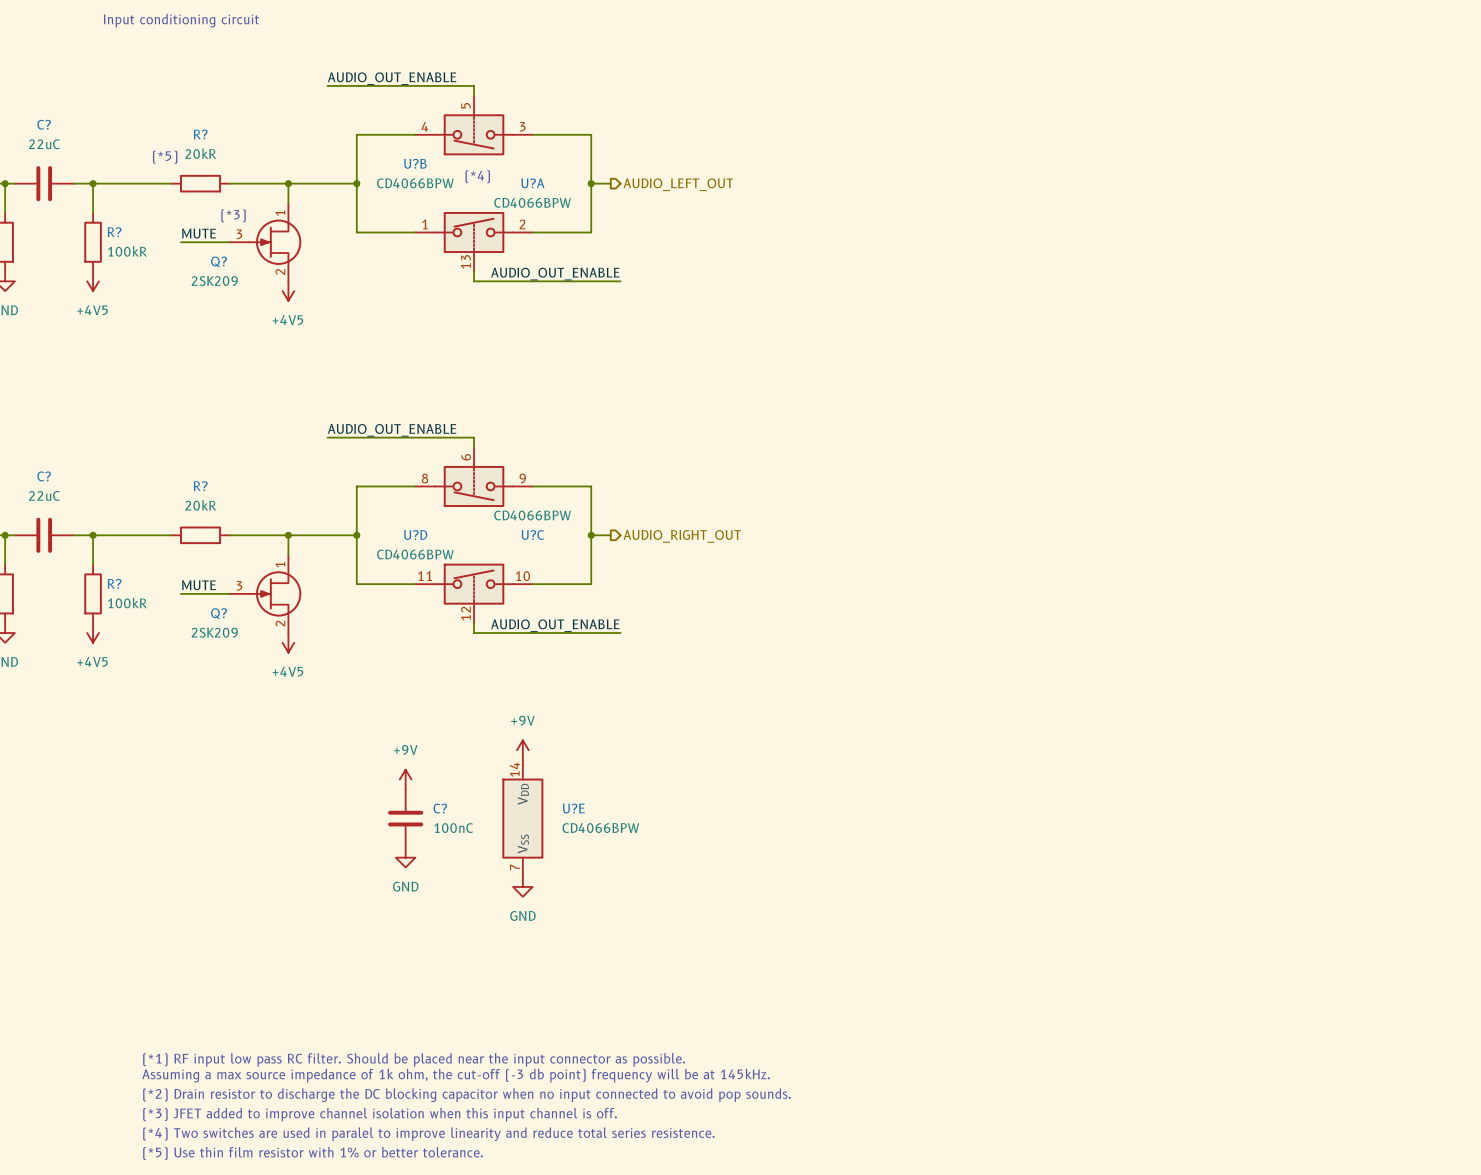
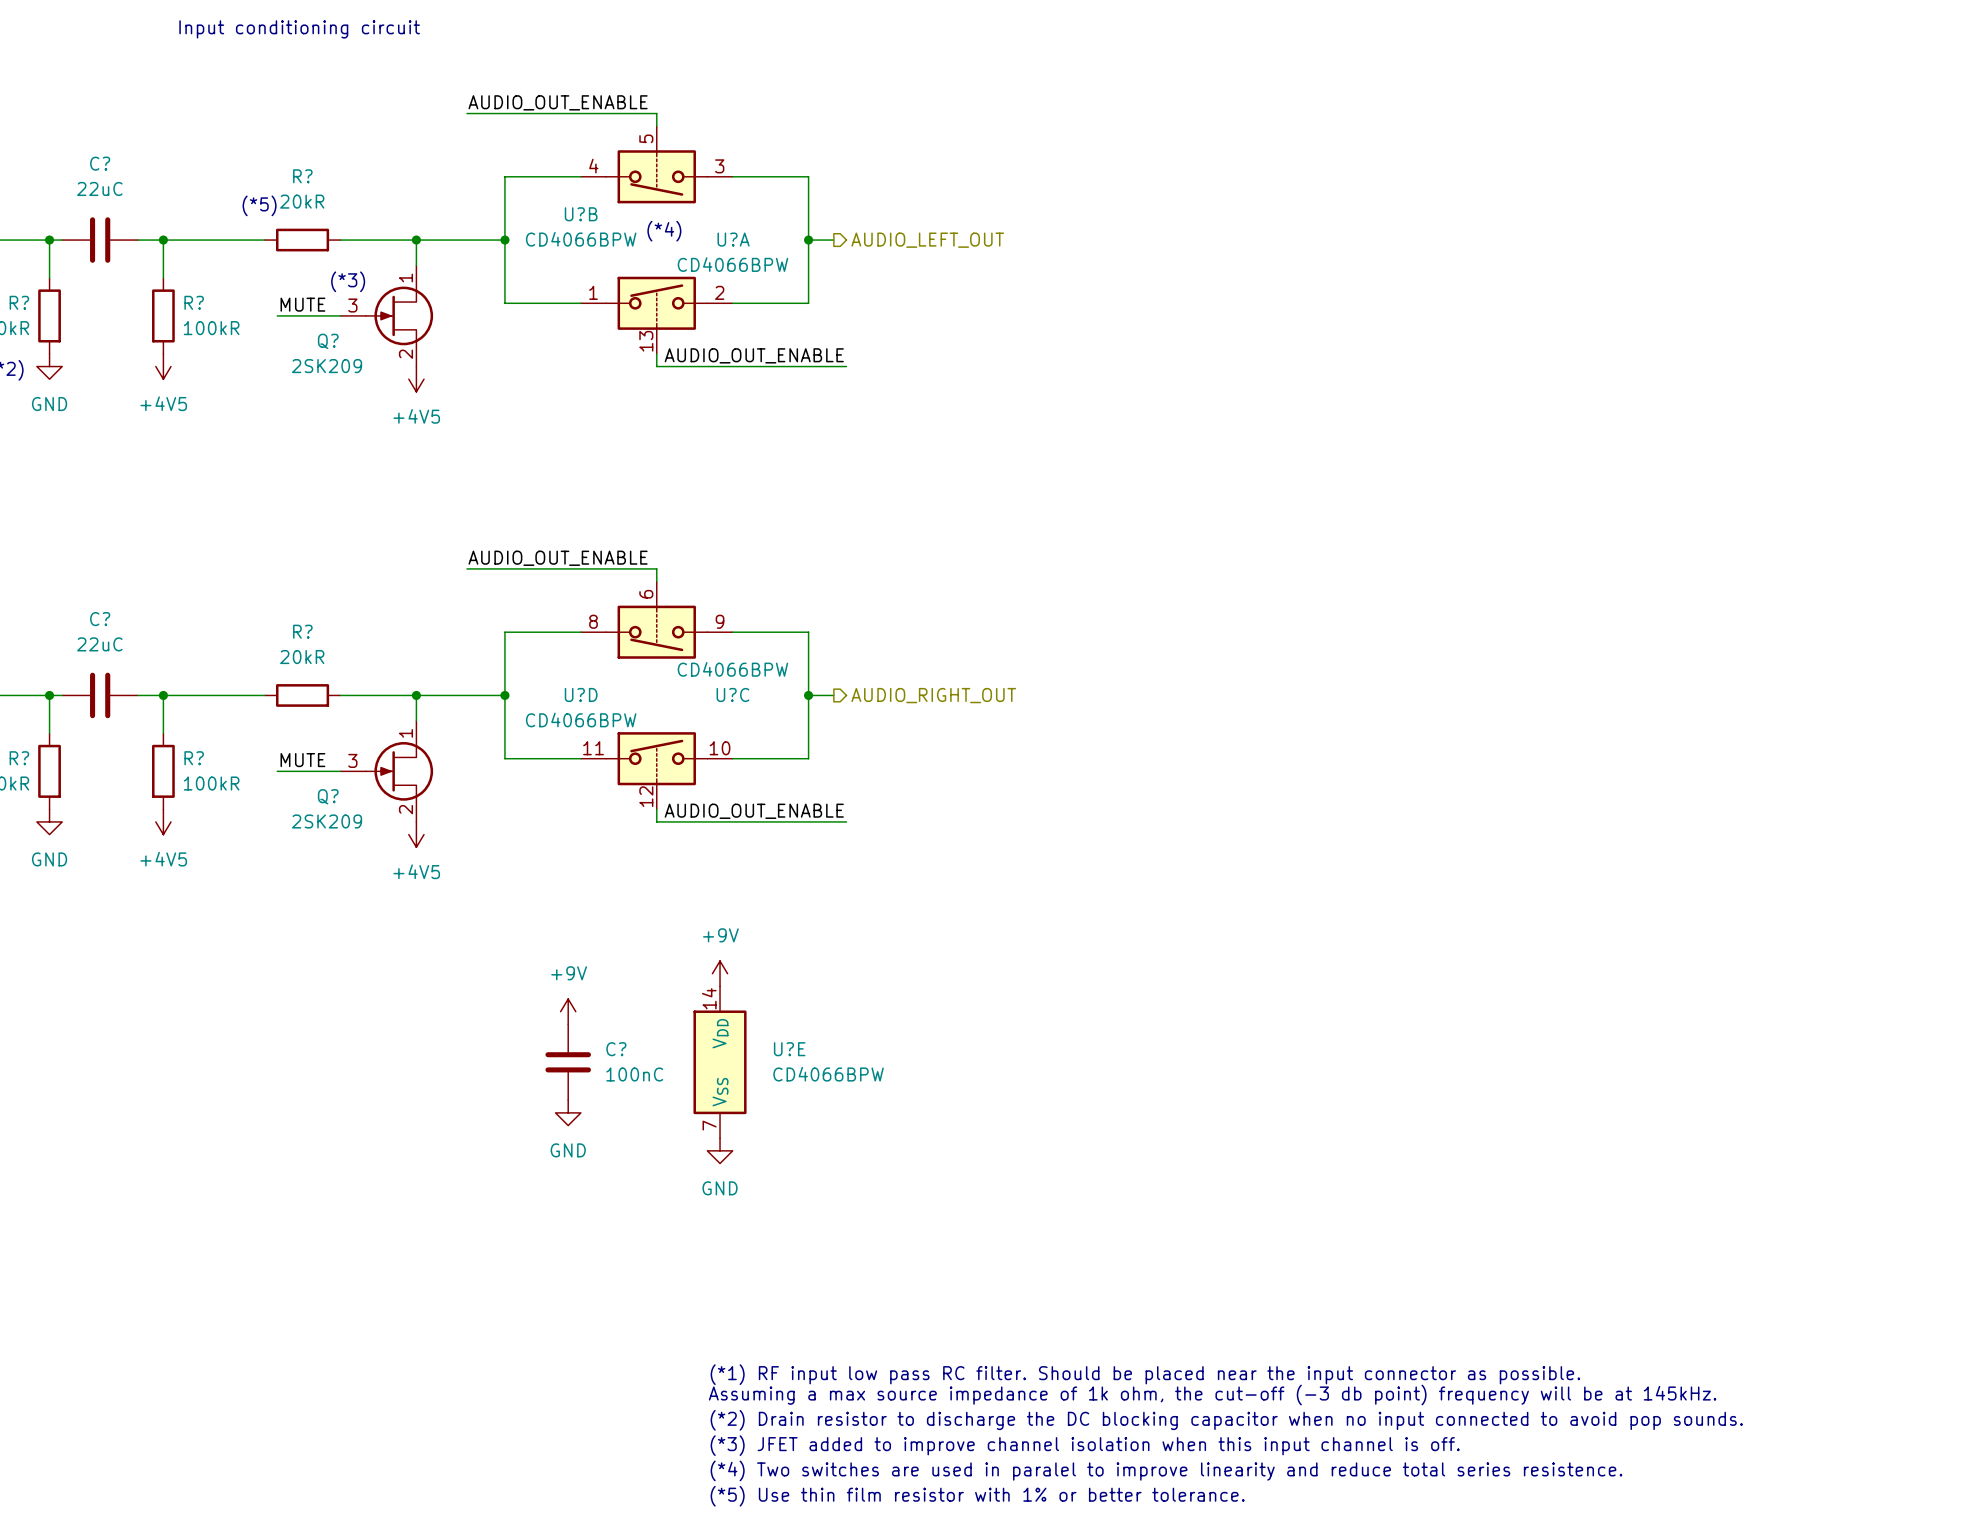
text: (*1) RF input low pass RC filter. Should be placed near the input connector as possible. (414, 1059) -> none
text: none -> (*1) RF input low pass RC filter. Should be placed near the input connector as possible. (1145, 1374)
text: Assuming a max source impedance of 1k ohm, the cut-off (-3 db point) frequency will be at 145kHz. (456, 1075) -> none
text: none -> Assuming a max source impedance of 1k ohm, the cut-off (-3 db point) frequency will be at 145kHz. (1212, 1395)
text: (*2) Drain resistor to discharge the DC blocking capacitor when no input connected to avoid pop sounds. (466, 1095) -> none
text: none -> (*2) Drain resistor to discharge the DC blocking capacitor when no input connected to avoid pop sounds. (1226, 1420)
text: (*3) JFET added to improve channel isolation when this input channel is off. (380, 1114) -> none
text: none -> (*3) JFET added to improve channel isolation when this input channel is off. (1085, 1445)
text: (*4) Two switches are used in paralel to improve linearity and reduce total series resistence. (428, 1134) -> none
text: none -> (*4) Two switches are used in paralel to improve linearity and reduce total series resistence. (1166, 1470)
text: (*5) Use thin film resistor with 1% or better tolerance. (313, 1153) -> none
text: none -> (*5) Use thin film resistor with 1% or better tolerance. (977, 1496)

